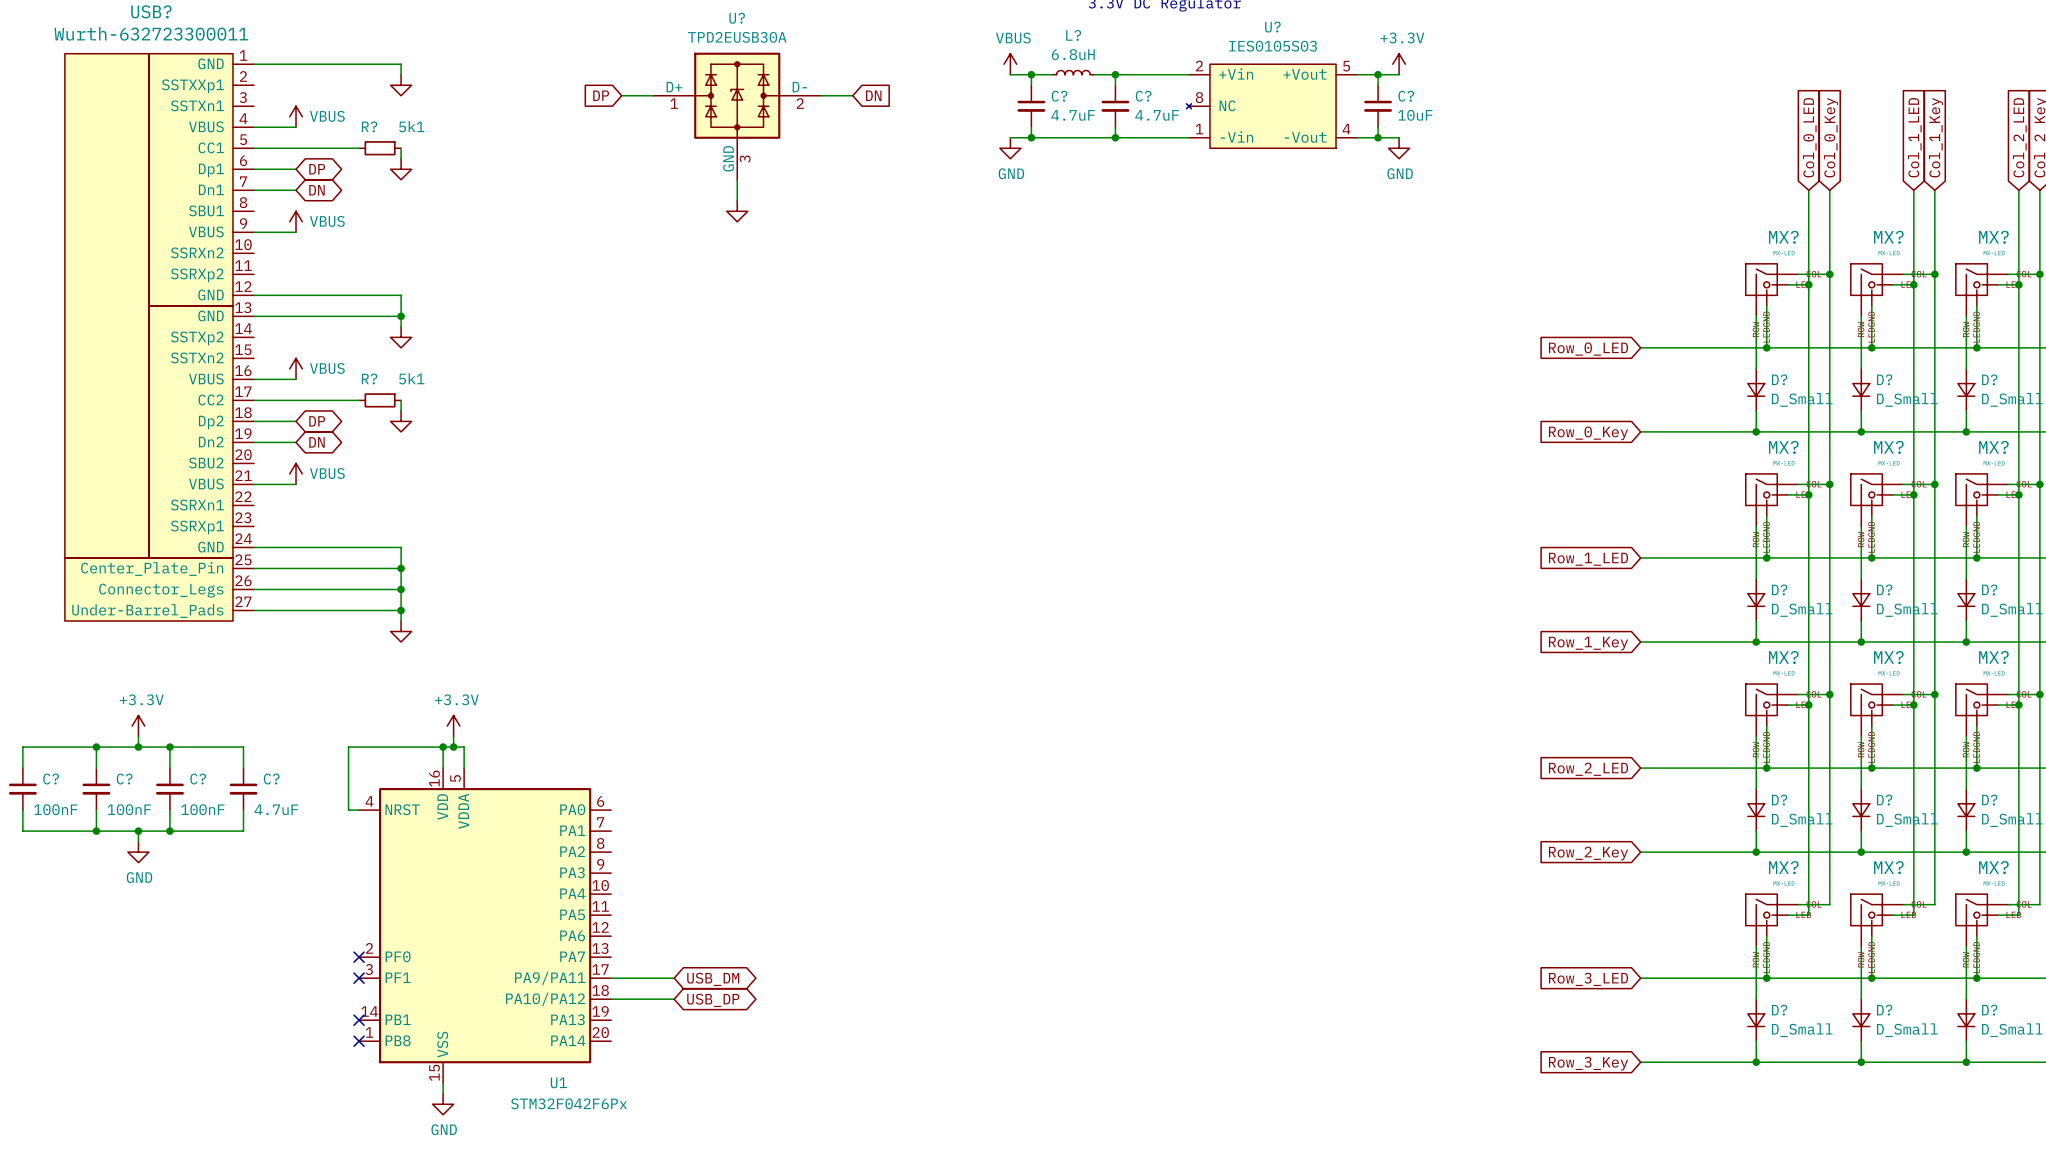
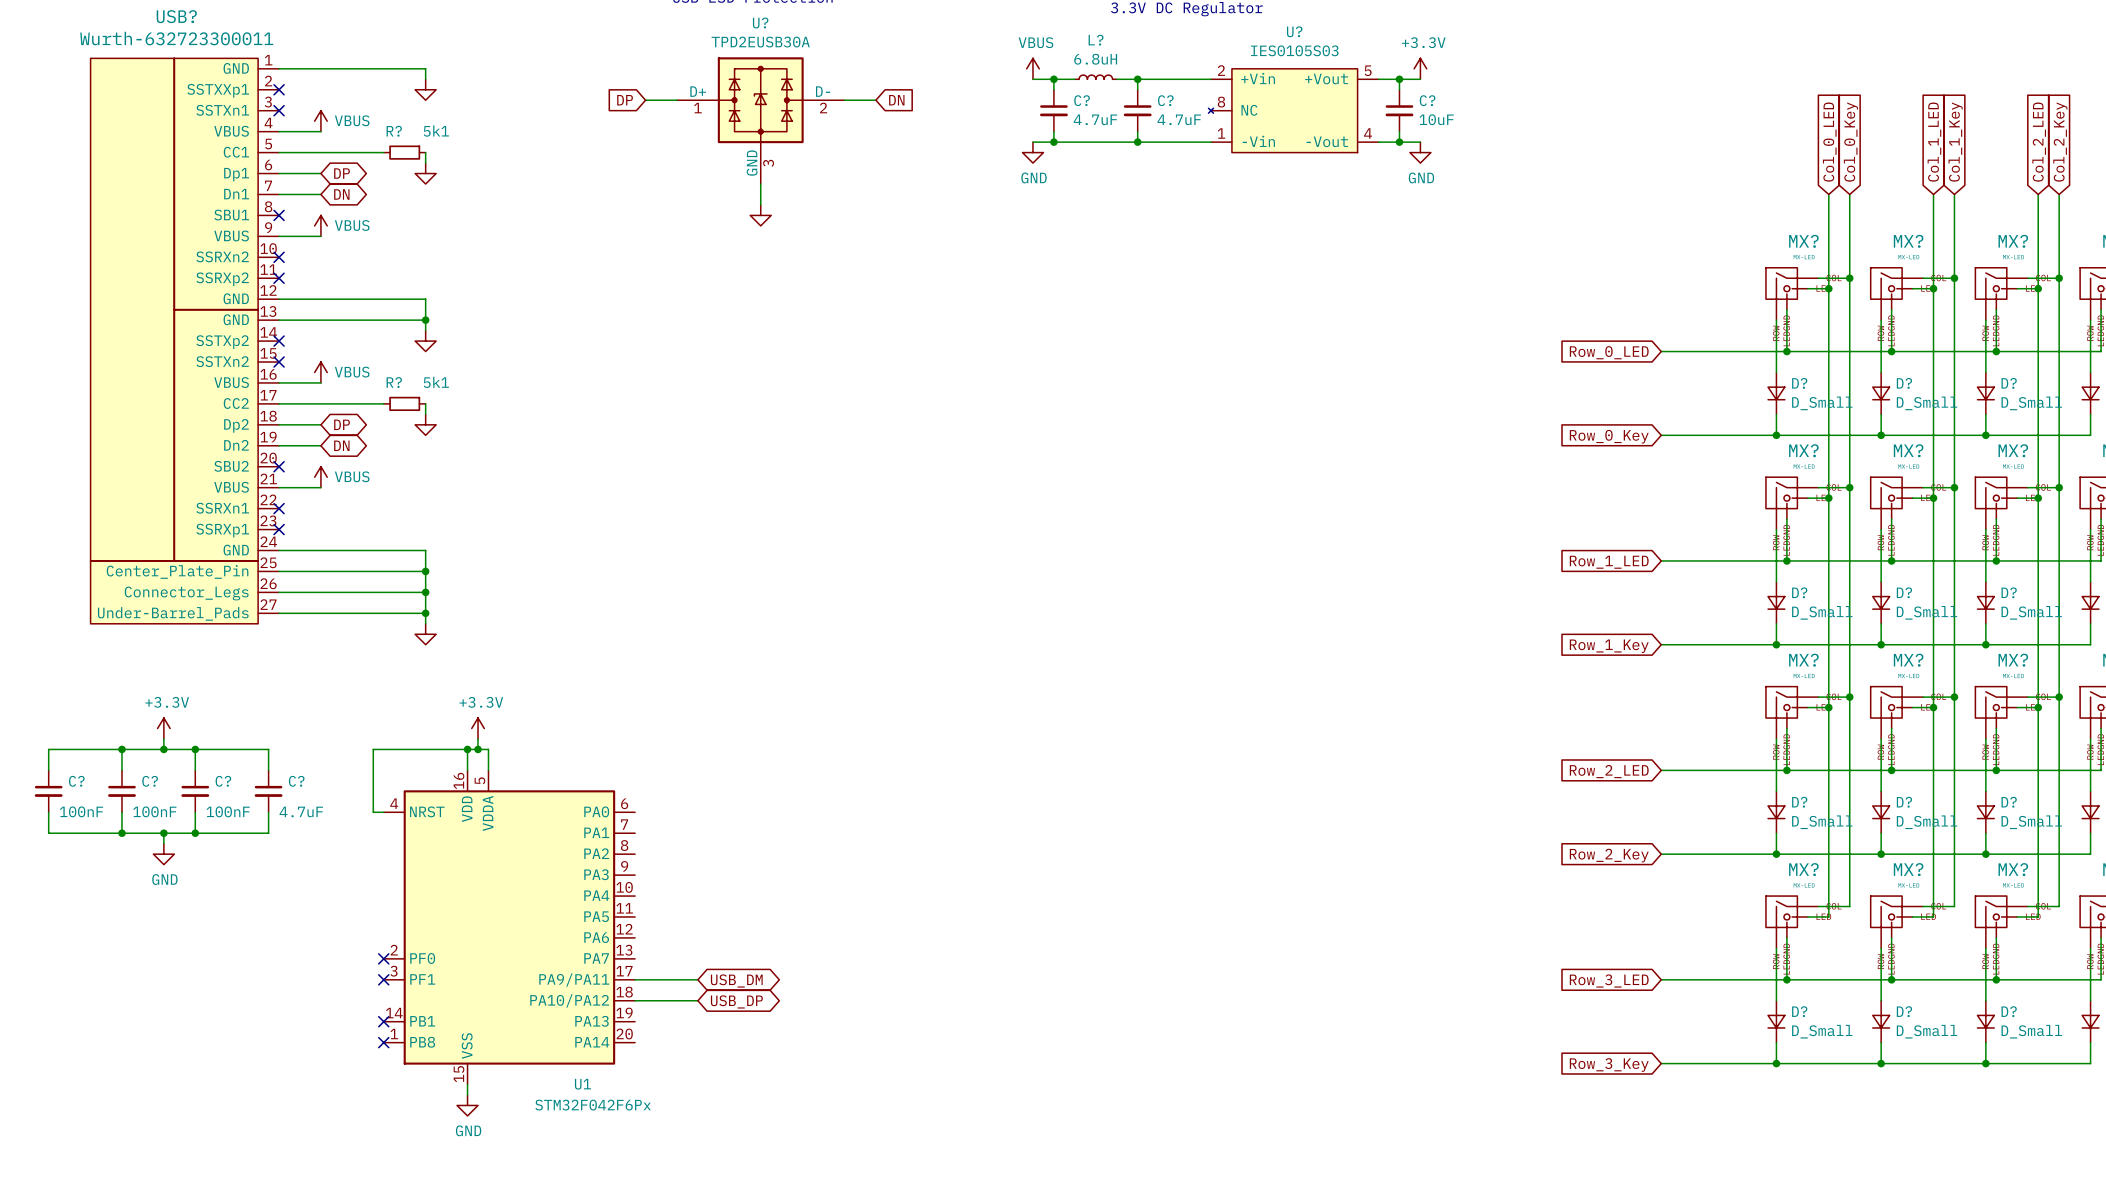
no-connect mark: none -> (279, 89)
no-connect mark: none -> (279, 110)
no-connect mark: none -> (279, 215)
no-connect mark: none -> (279, 257)
no-connect mark: none -> (279, 278)
no-connect mark: none -> (279, 341)
no-connect mark: none -> (279, 362)
no-connect mark: none -> (279, 466)
no-connect mark: none -> (279, 508)
no-connect mark: none -> (279, 529)

